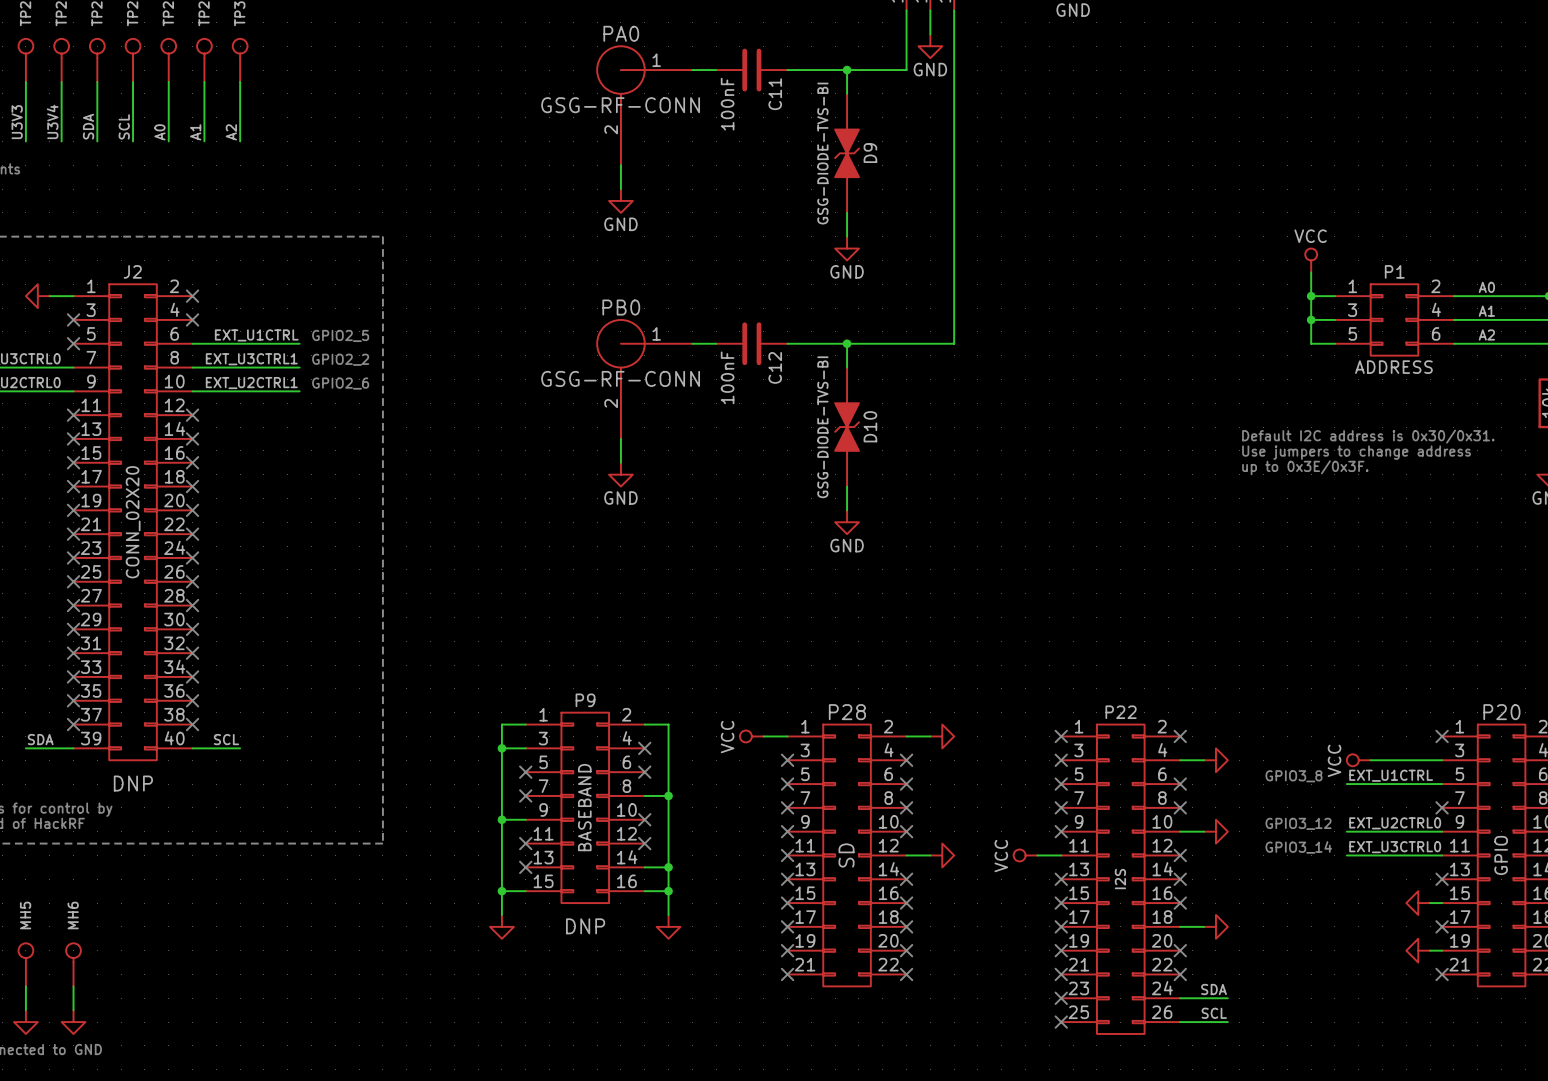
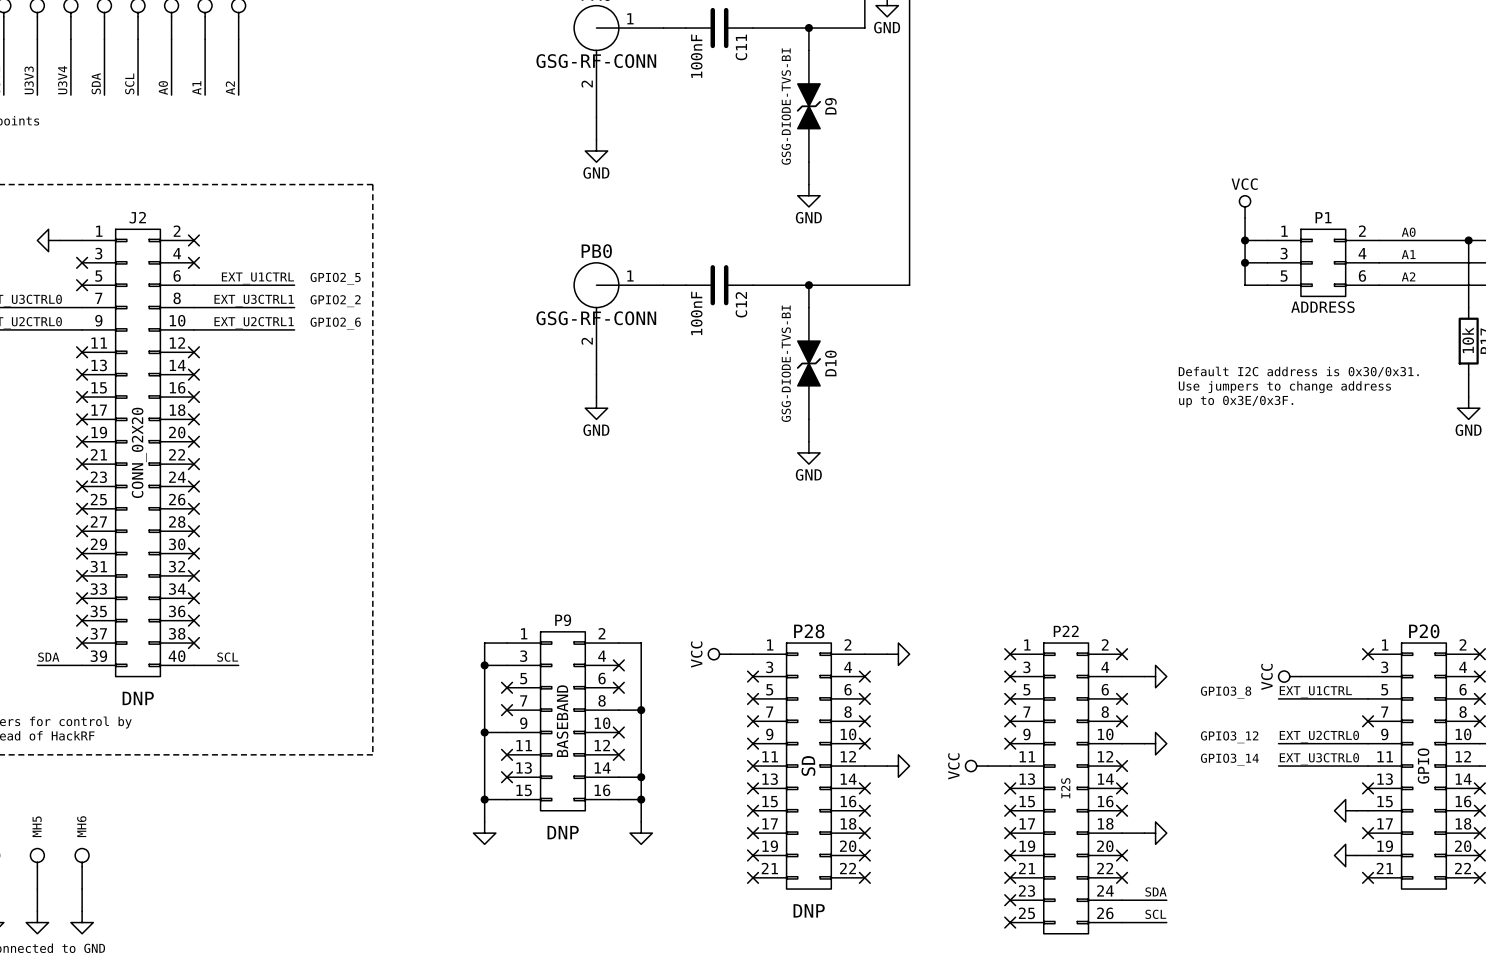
P28 text: none -> DNP (809, 910)

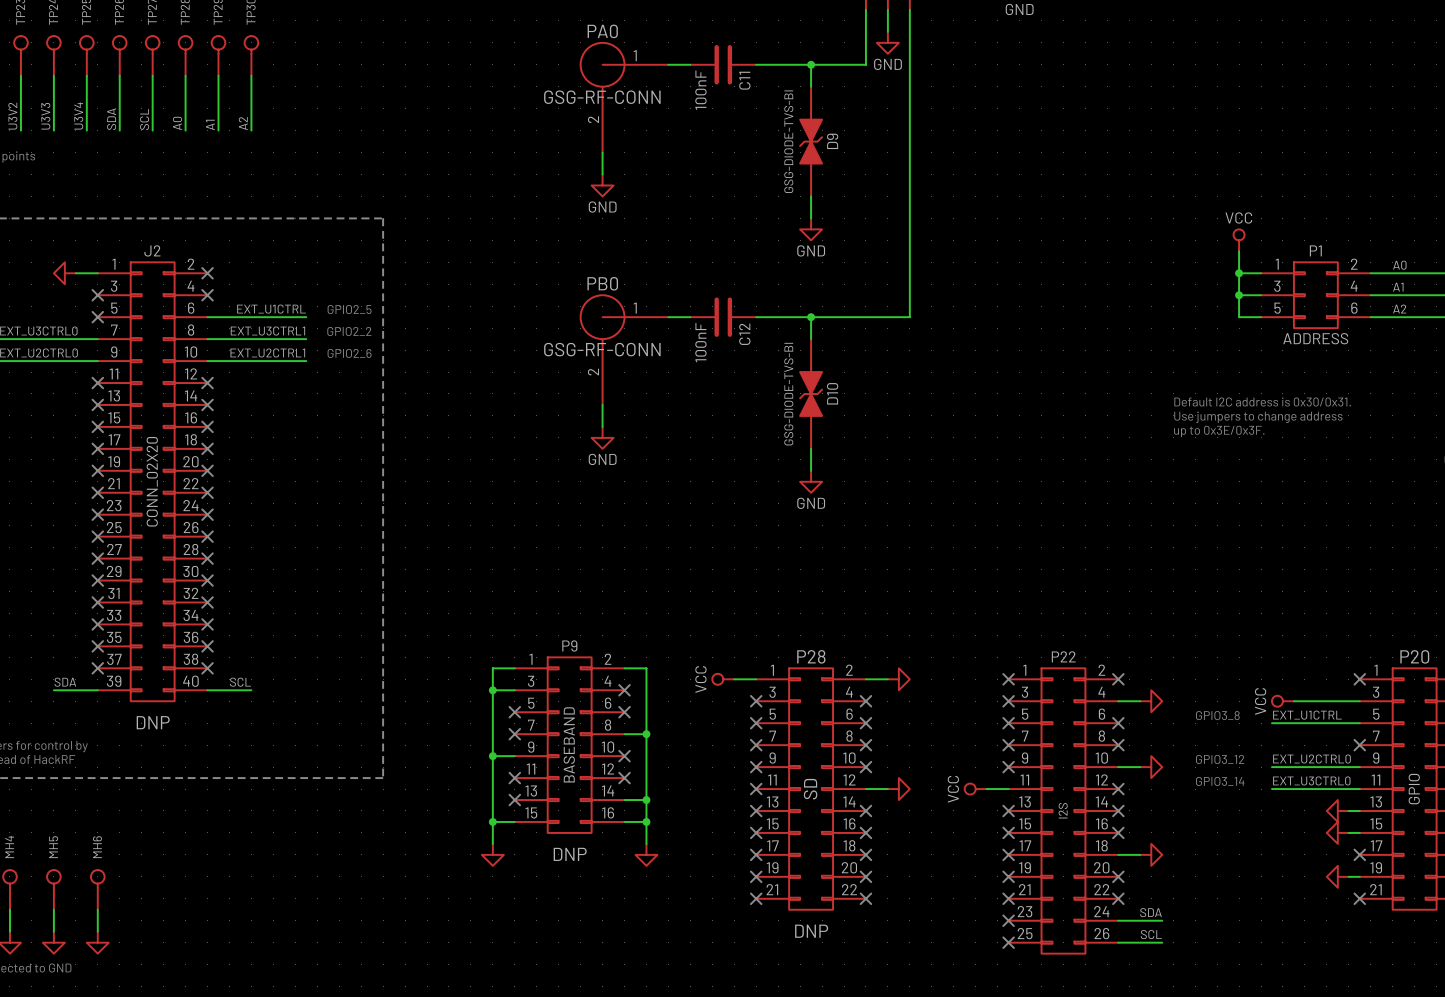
power symbol: none -> (1337, 810)
wire: none -> (1348, 810) (1359, 810)
no-connect mark: (1368, 788) -> none

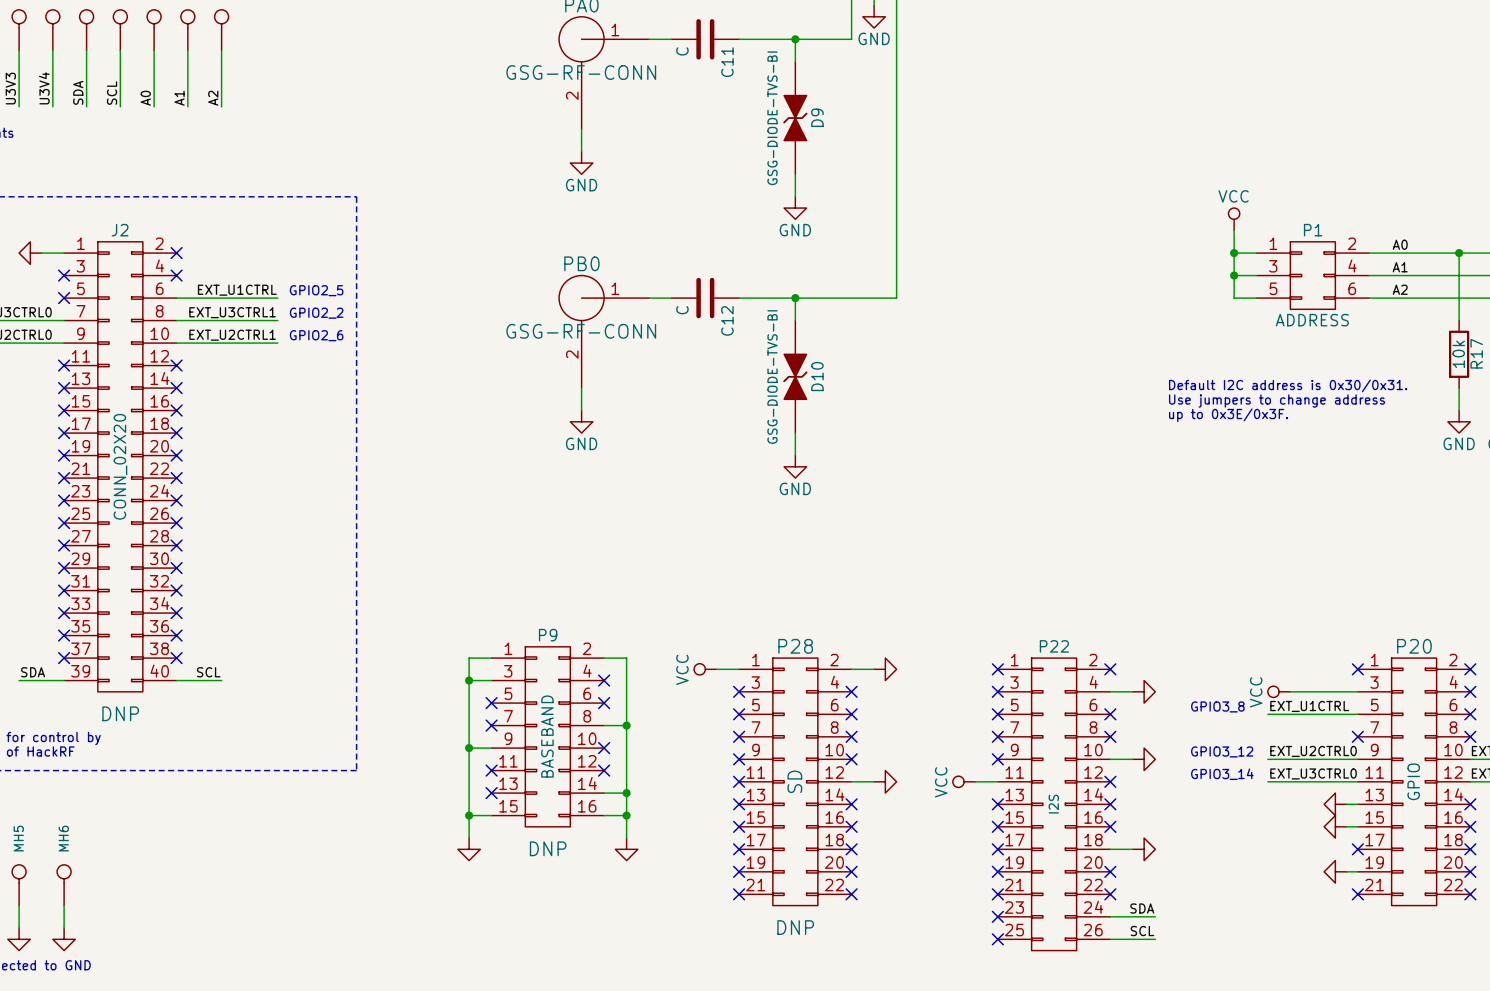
C11 value: 100nF (700, 90) -> C (682, 51)
C12 value: 100nF (700, 342) -> C (682, 310)

